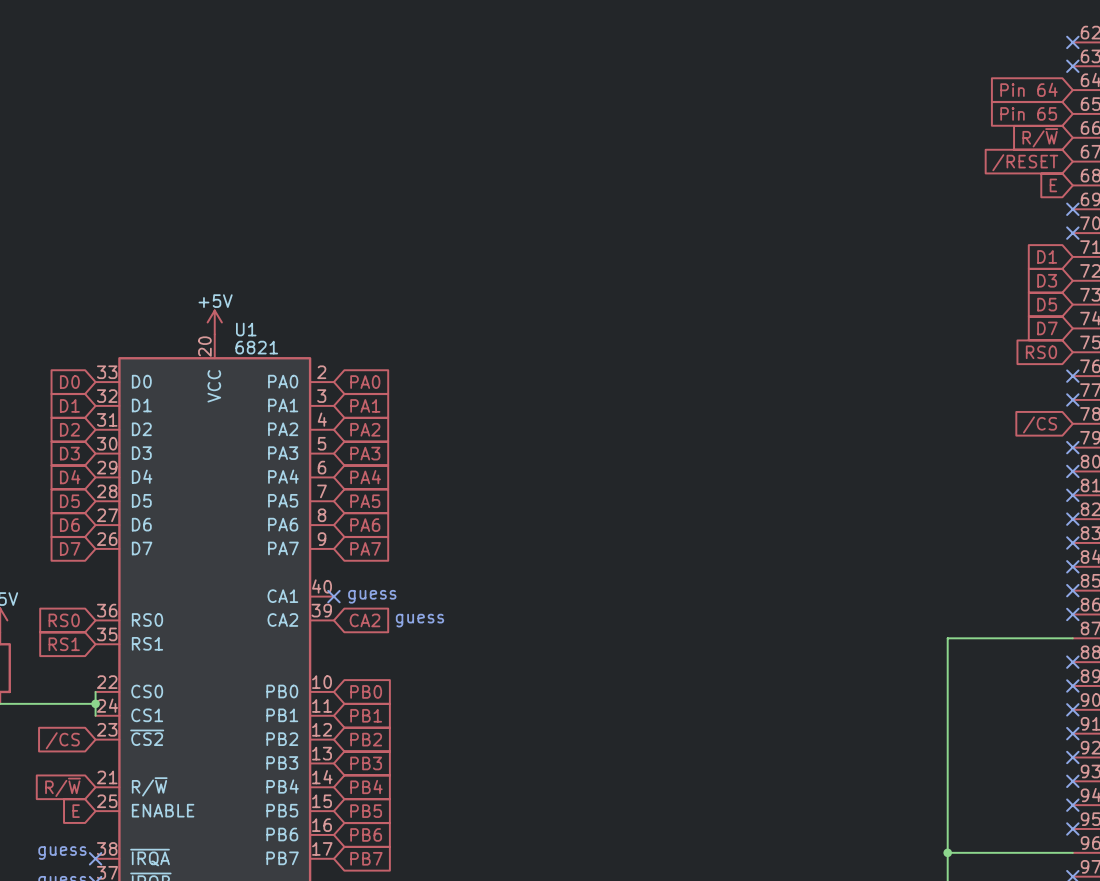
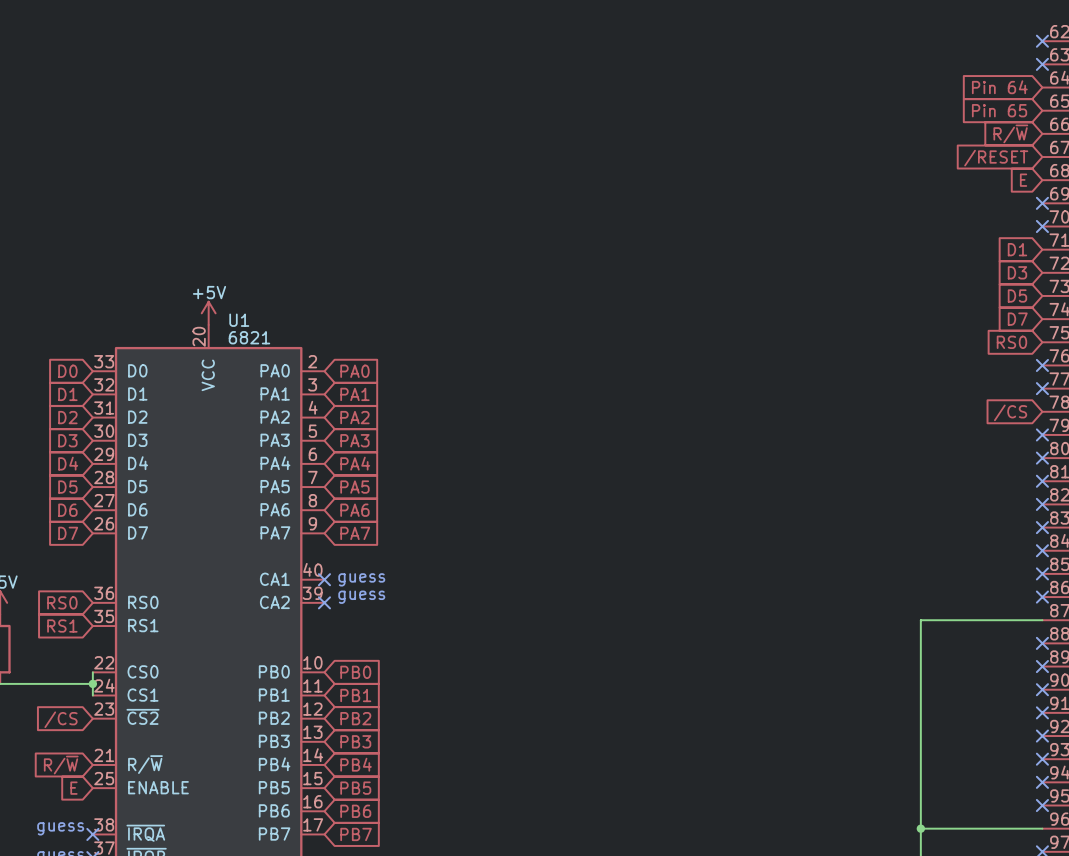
no-connect mark: none -> (324, 602)
global label: CA2 (365, 620) -> none
text position: guess (420, 620) -> guess (361, 597)

